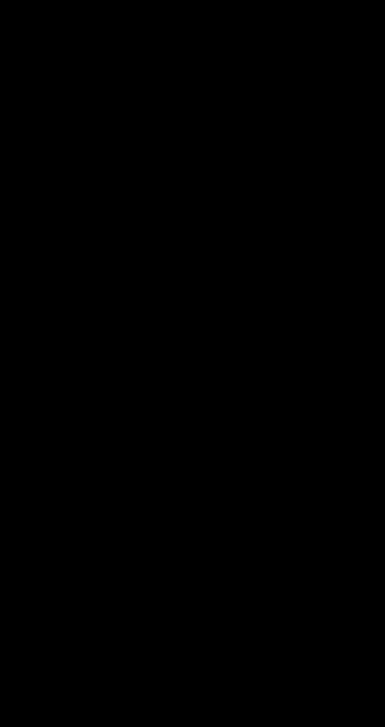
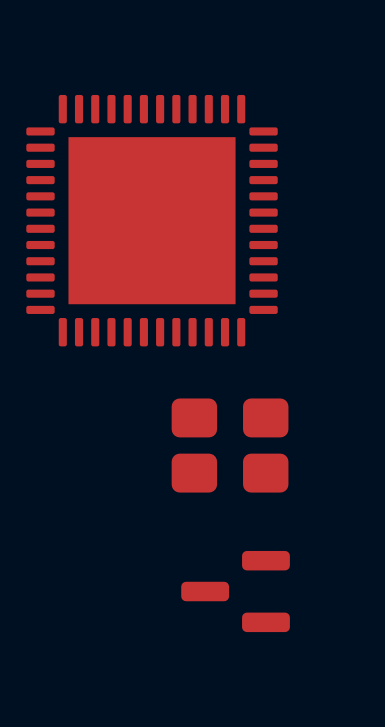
part: none -> (152, 220)
part: none -> (230, 445)
part: none -> (235, 591)

